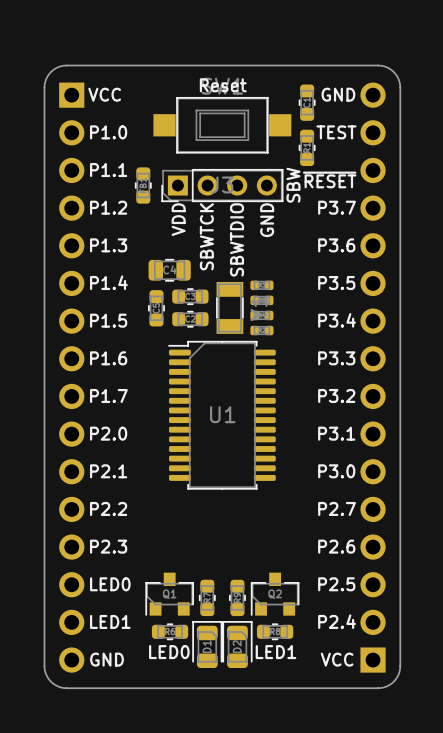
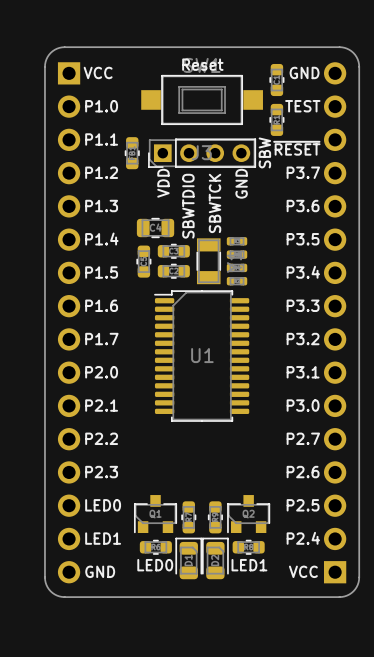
text: SBWTCK (206, 236) -> SBWTDIO (188, 206)
text: SBWTDIO (237, 239) -> SBWTCK (215, 203)

